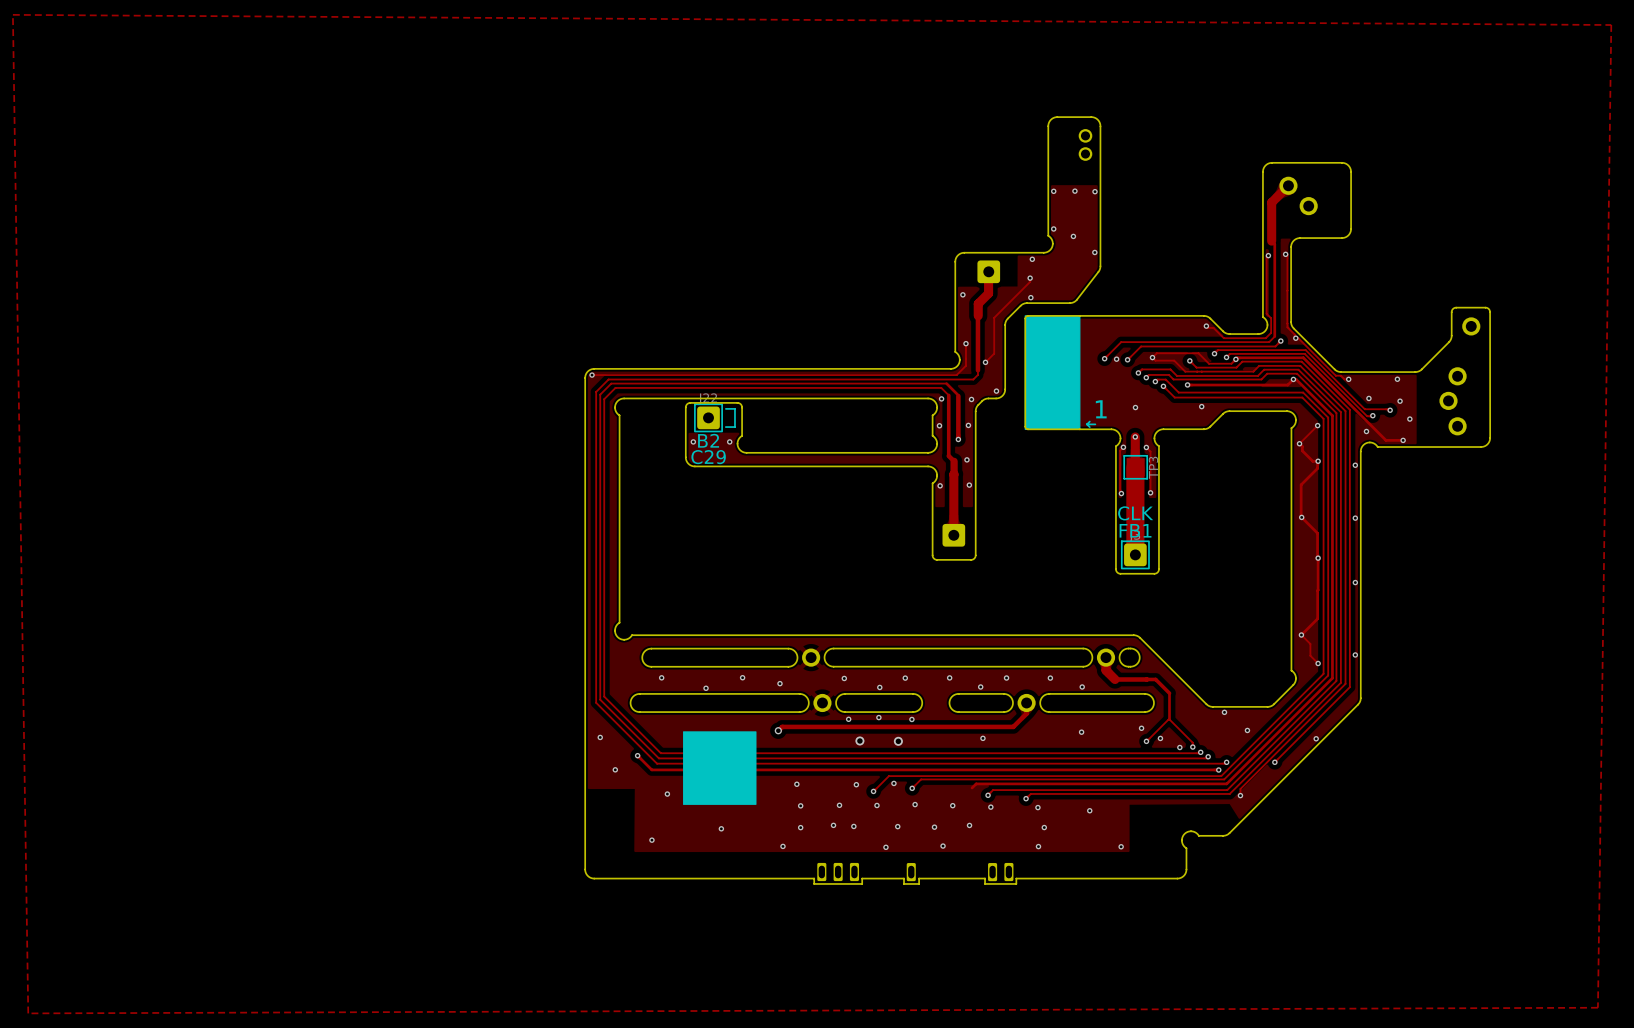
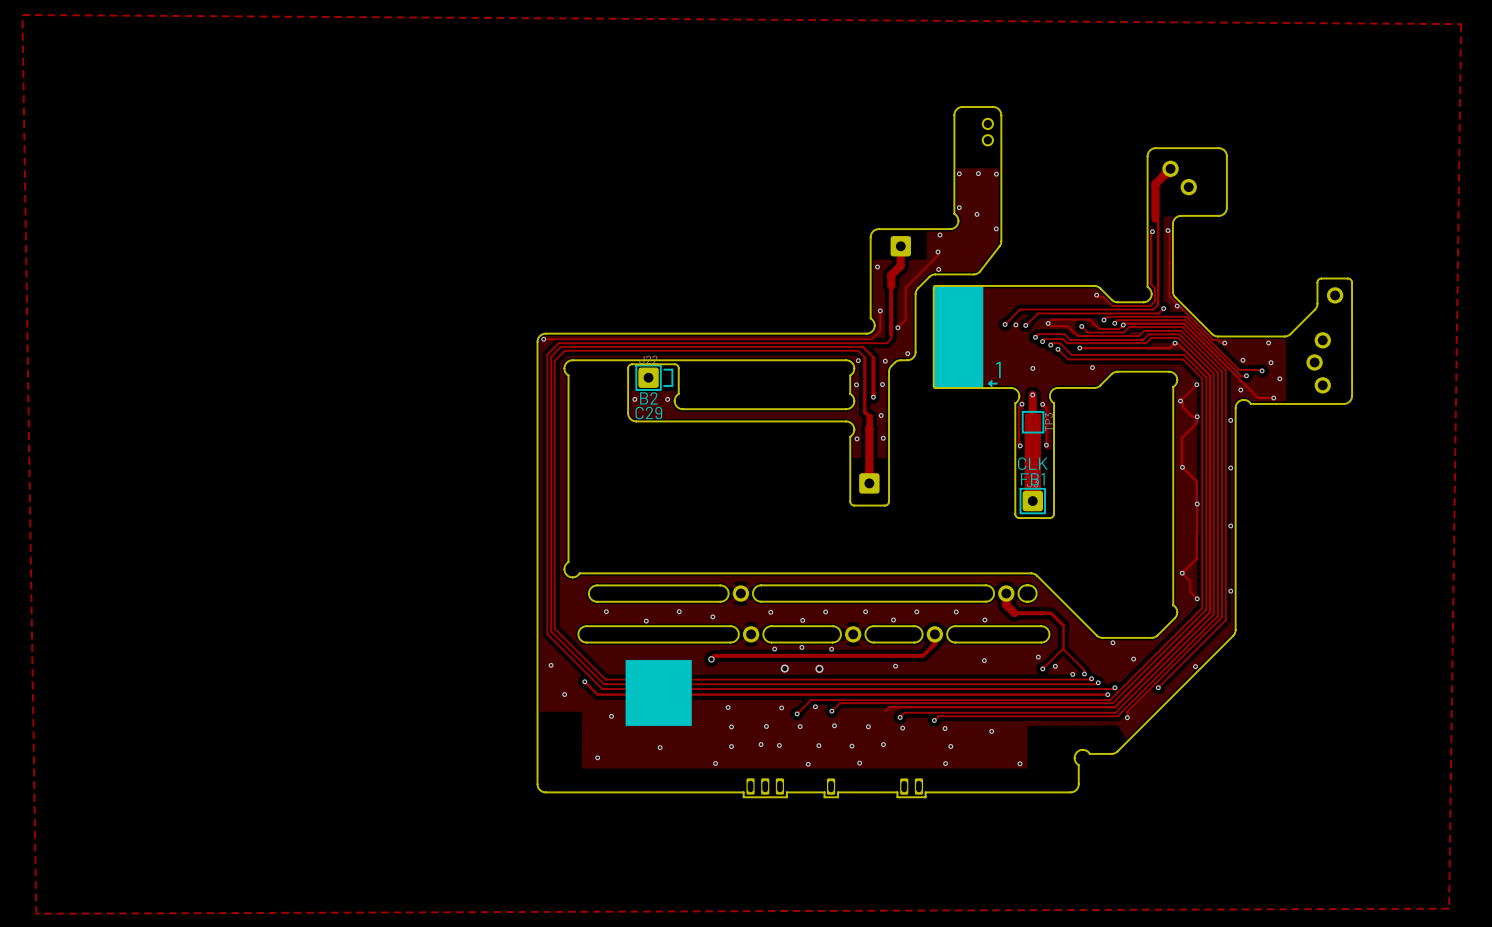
part: none -> (853, 634)

